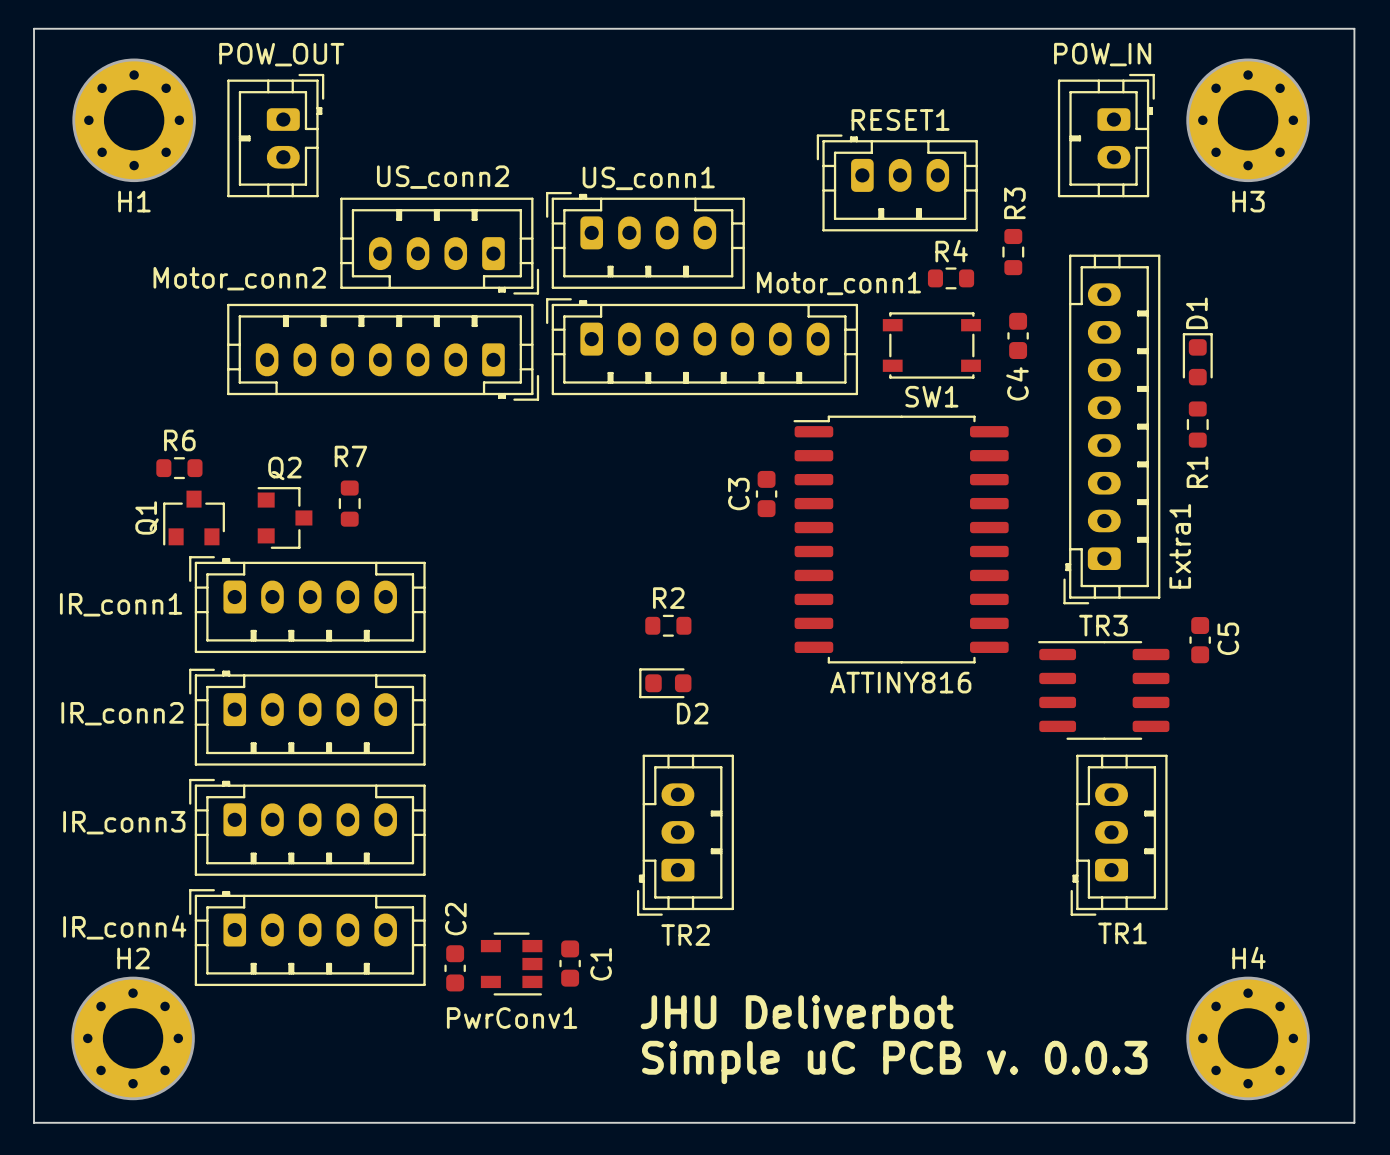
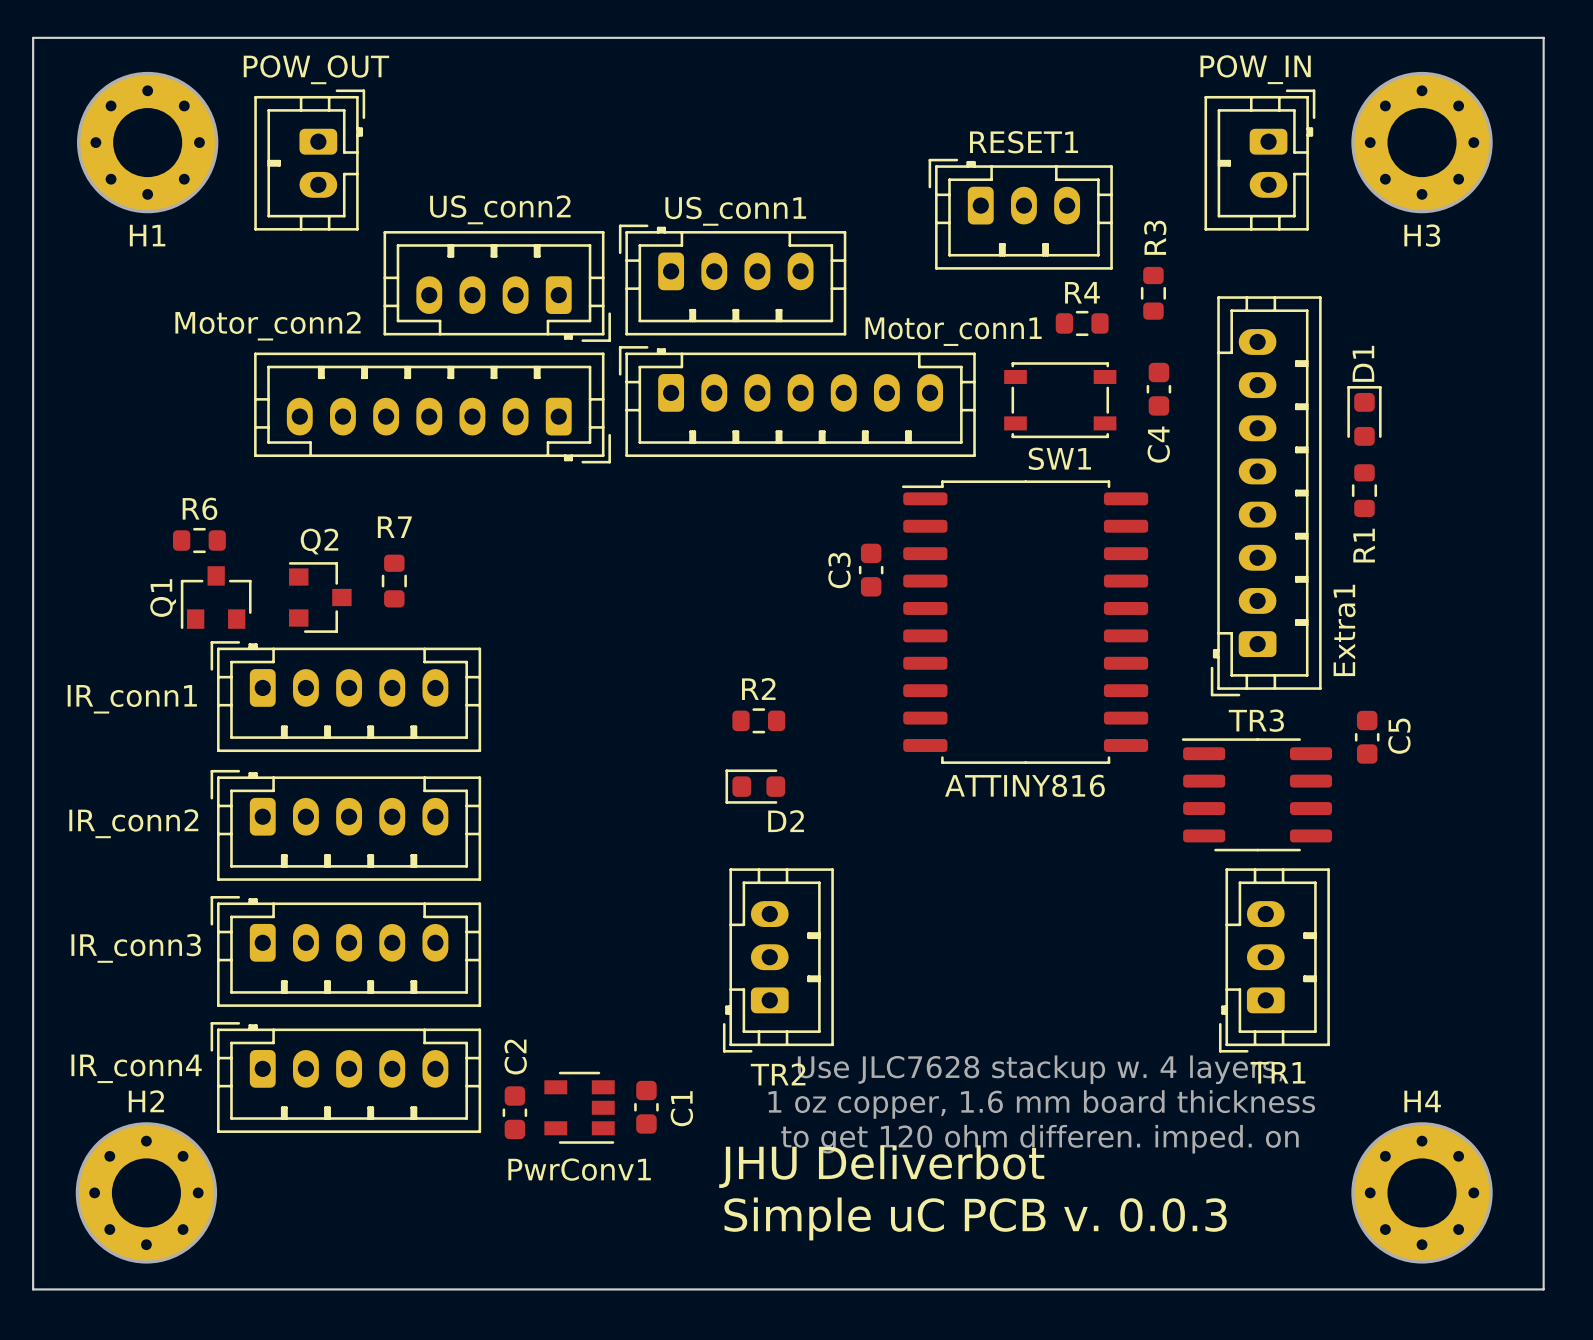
text: none -> Use JLC7628 stackup w. 4 layers, (1040, 1069)
text: none -> 1 oz copper, 1.6 mm board thickness (1041, 1104)
text: none -> to get 120 ohm differen. imped. on (1040, 1139)

